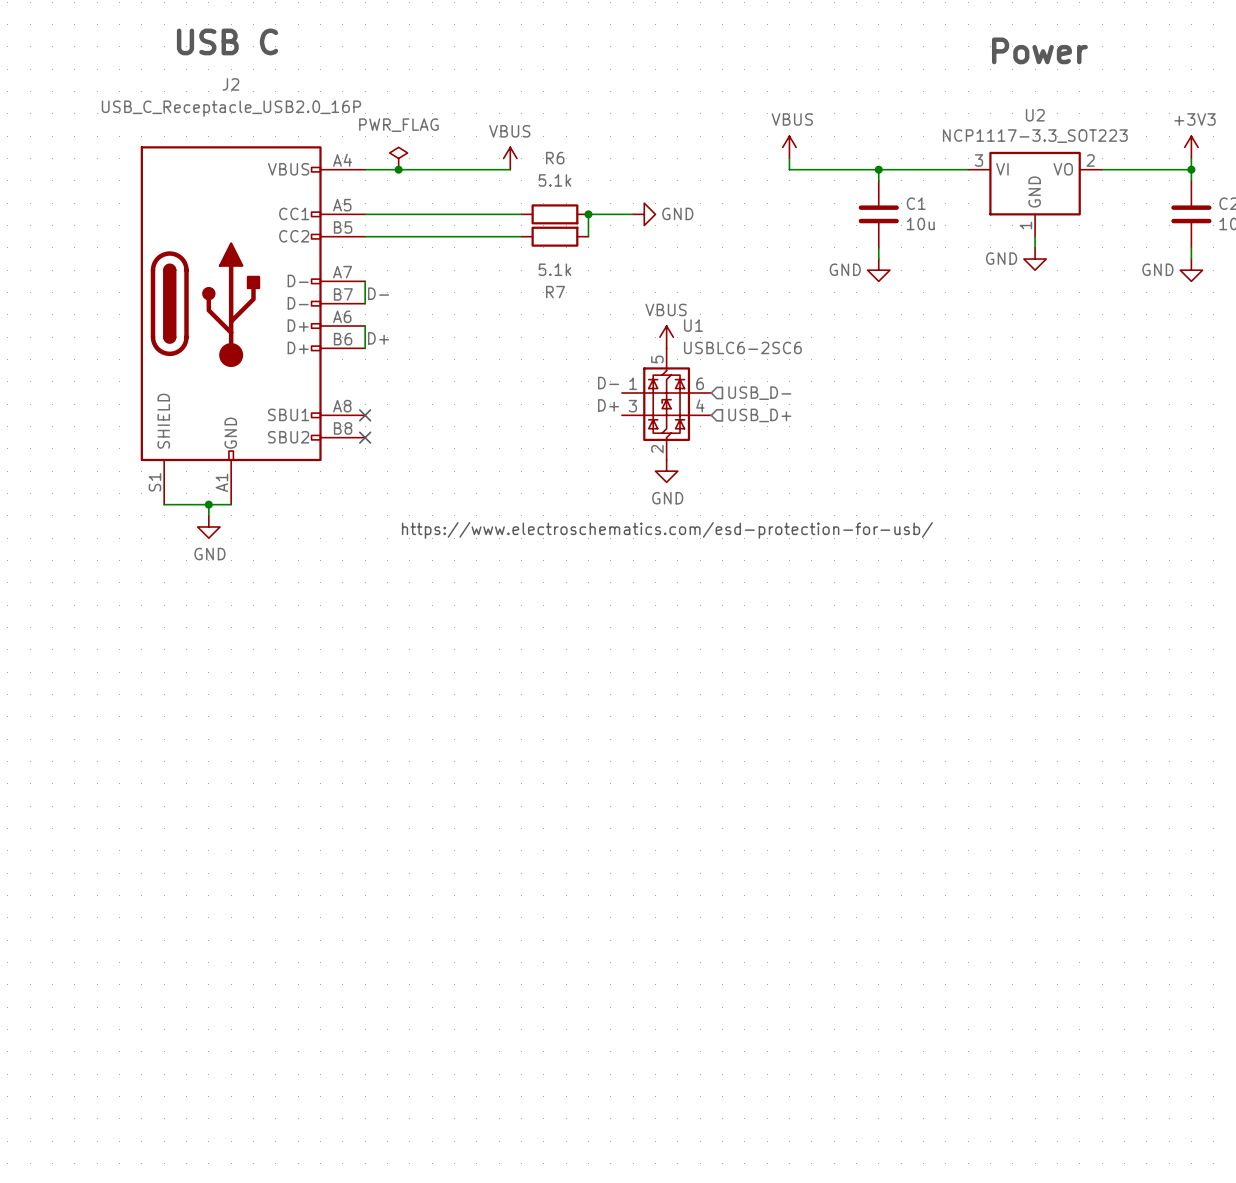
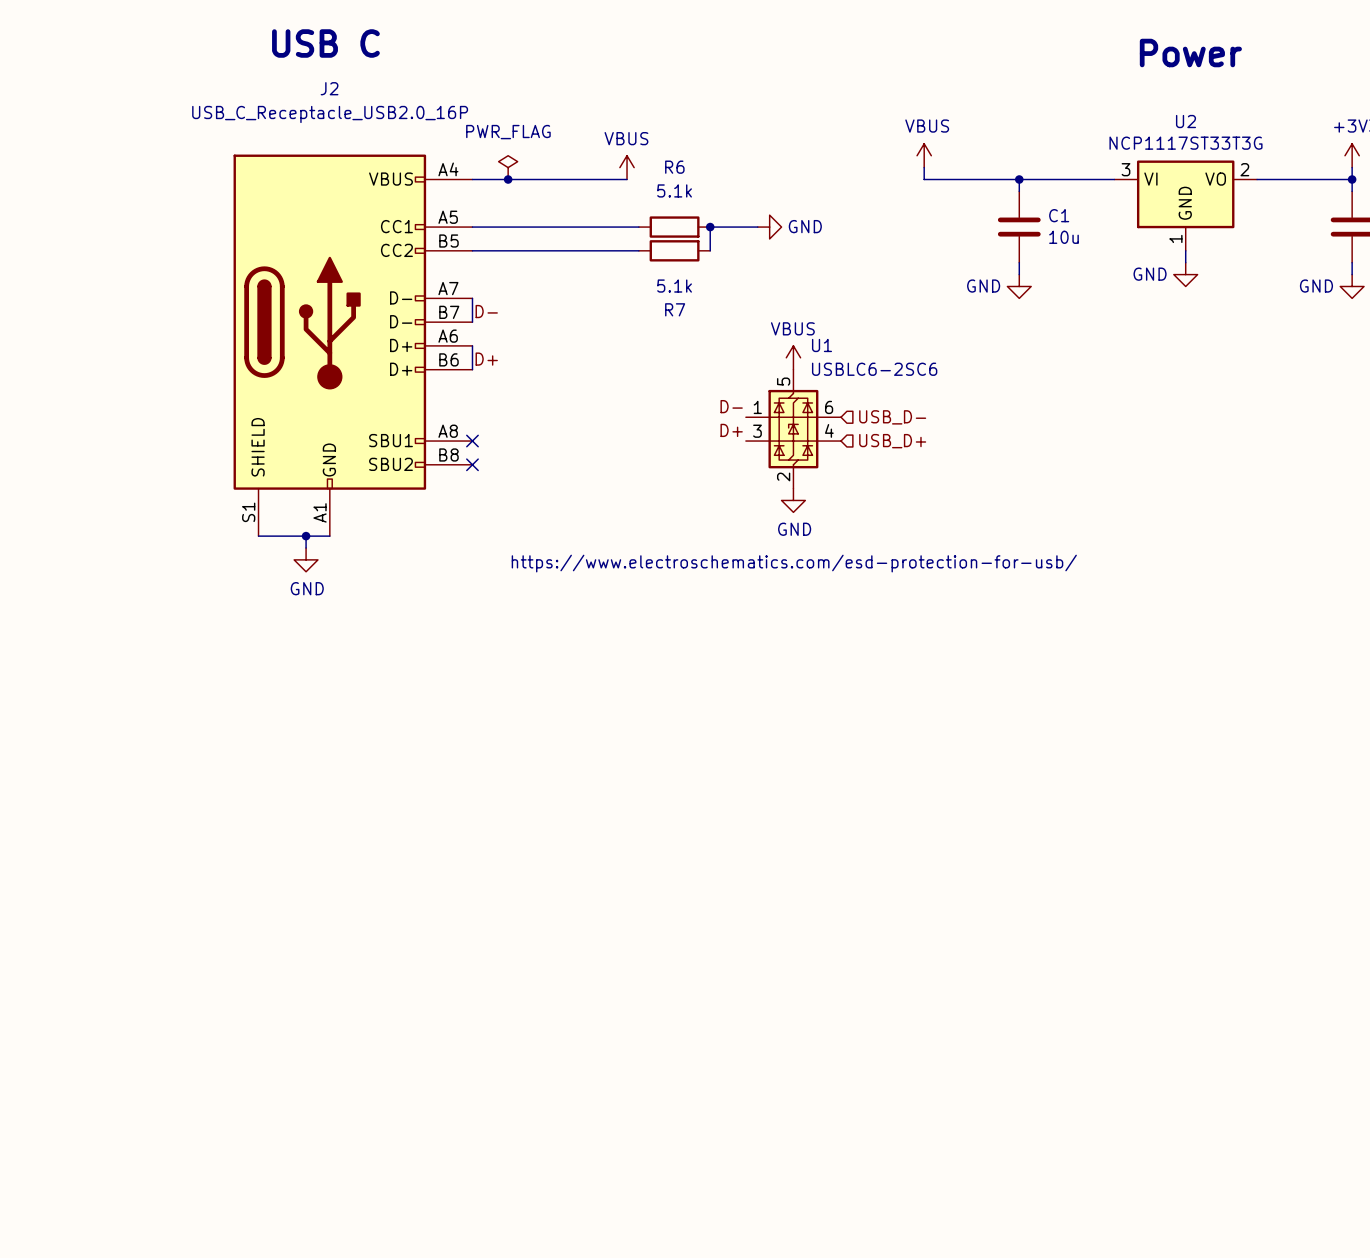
U2 value: NCP1117-3.3_SOT223 (1035, 136) -> NCP1117ST33T3G (1185, 143)

